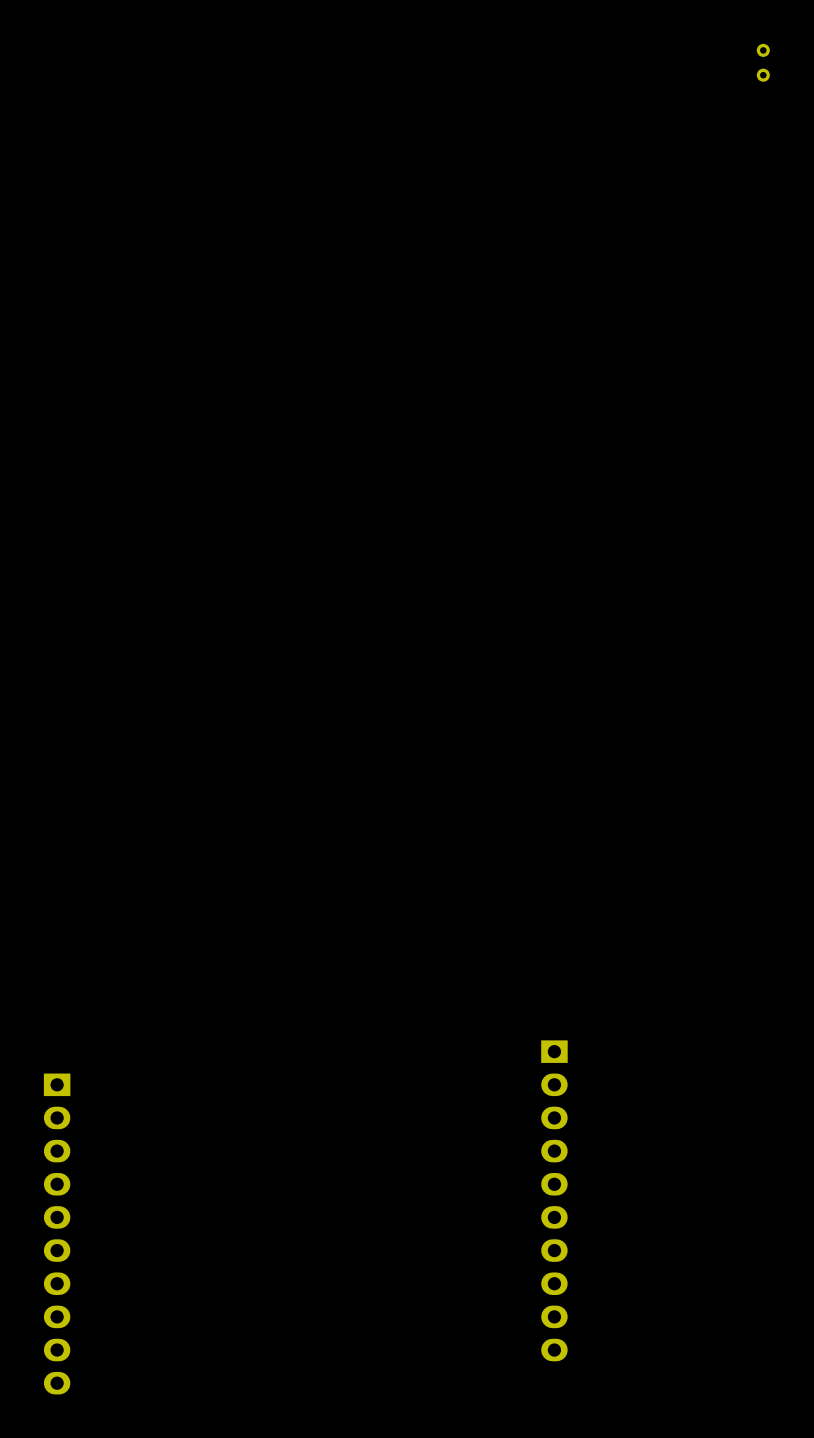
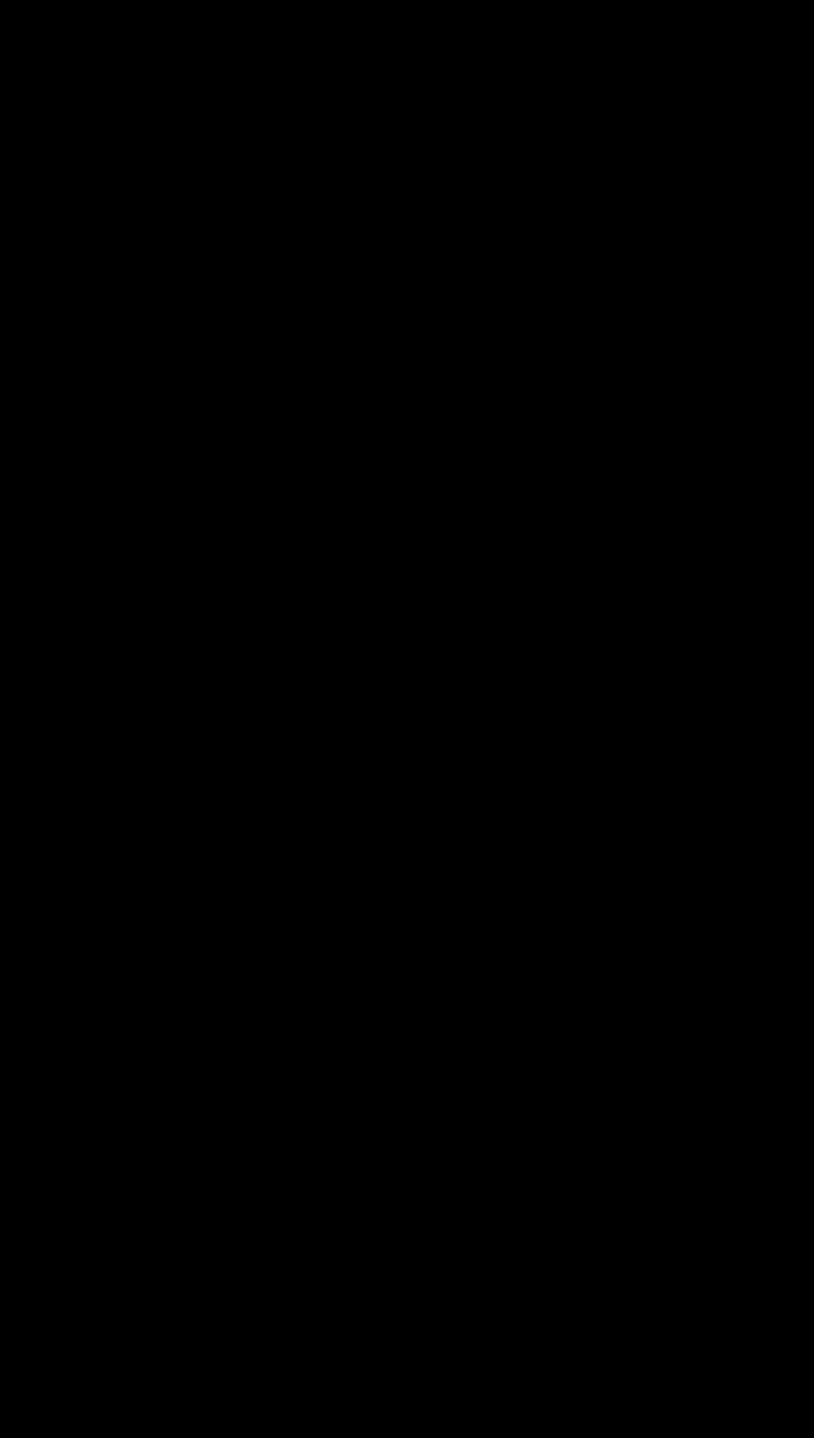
part: (763, 62) -> none
part: (554, 1200) -> none
part: (57, 1233) -> none

